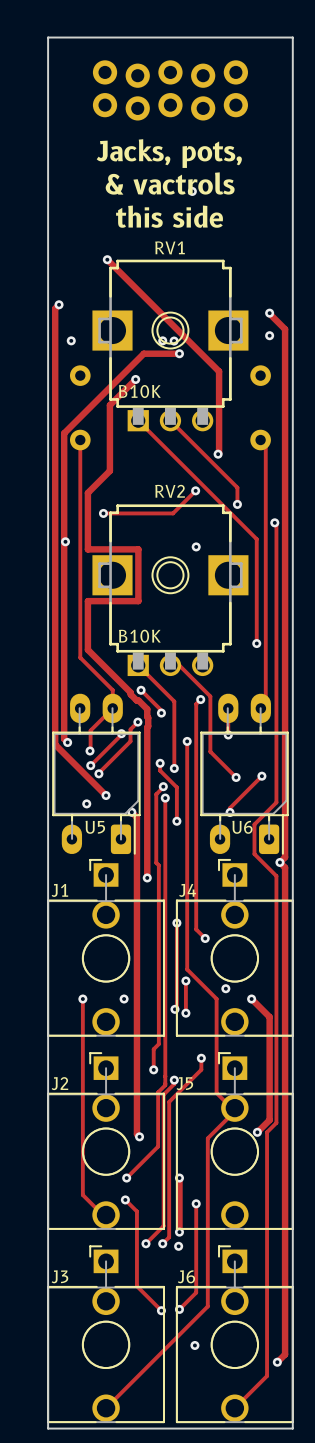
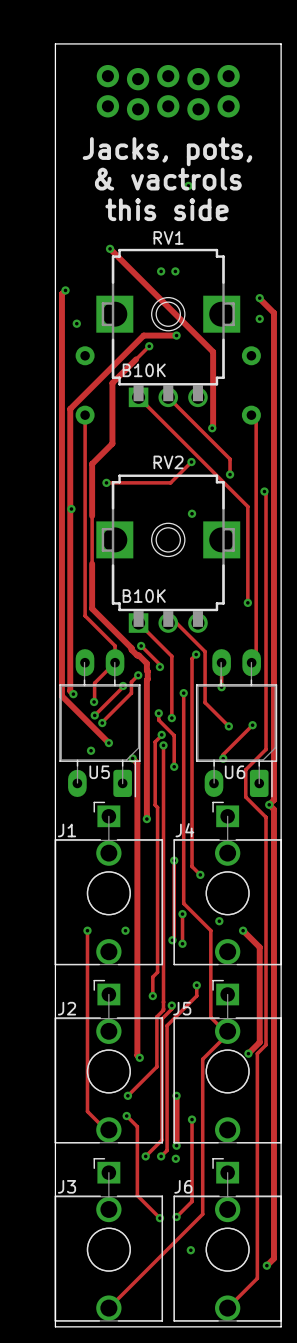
via: none -> (161, 271)
via: none -> (175, 271)
via: (162, 340) -> none
via: (174, 341) -> none
track: none -> (149, 346) (136, 359)
via: none -> (149, 346)
via: (135, 379) -> none
track: (87, 549) (138, 549) (138, 601) (87, 601) -> (92, 516) (92, 563)

